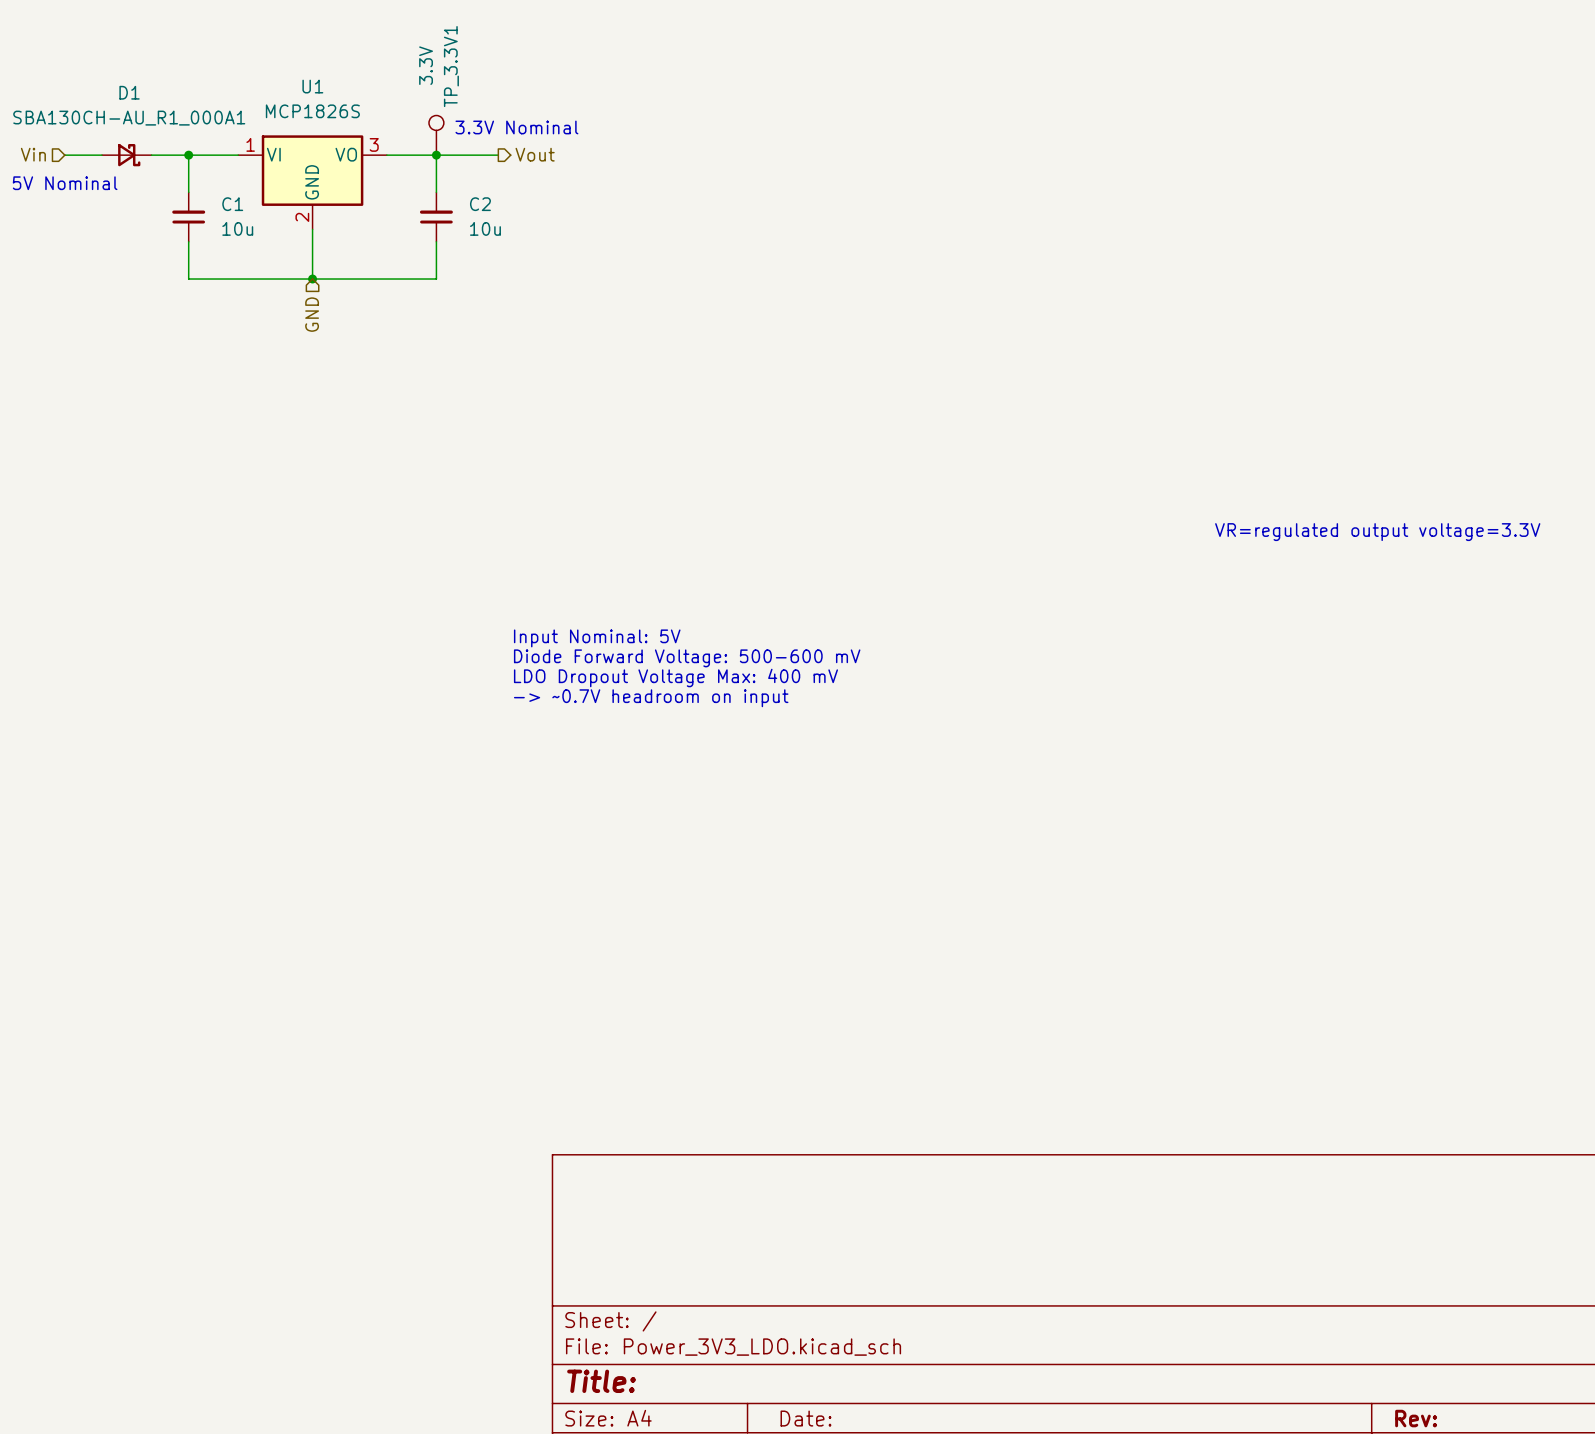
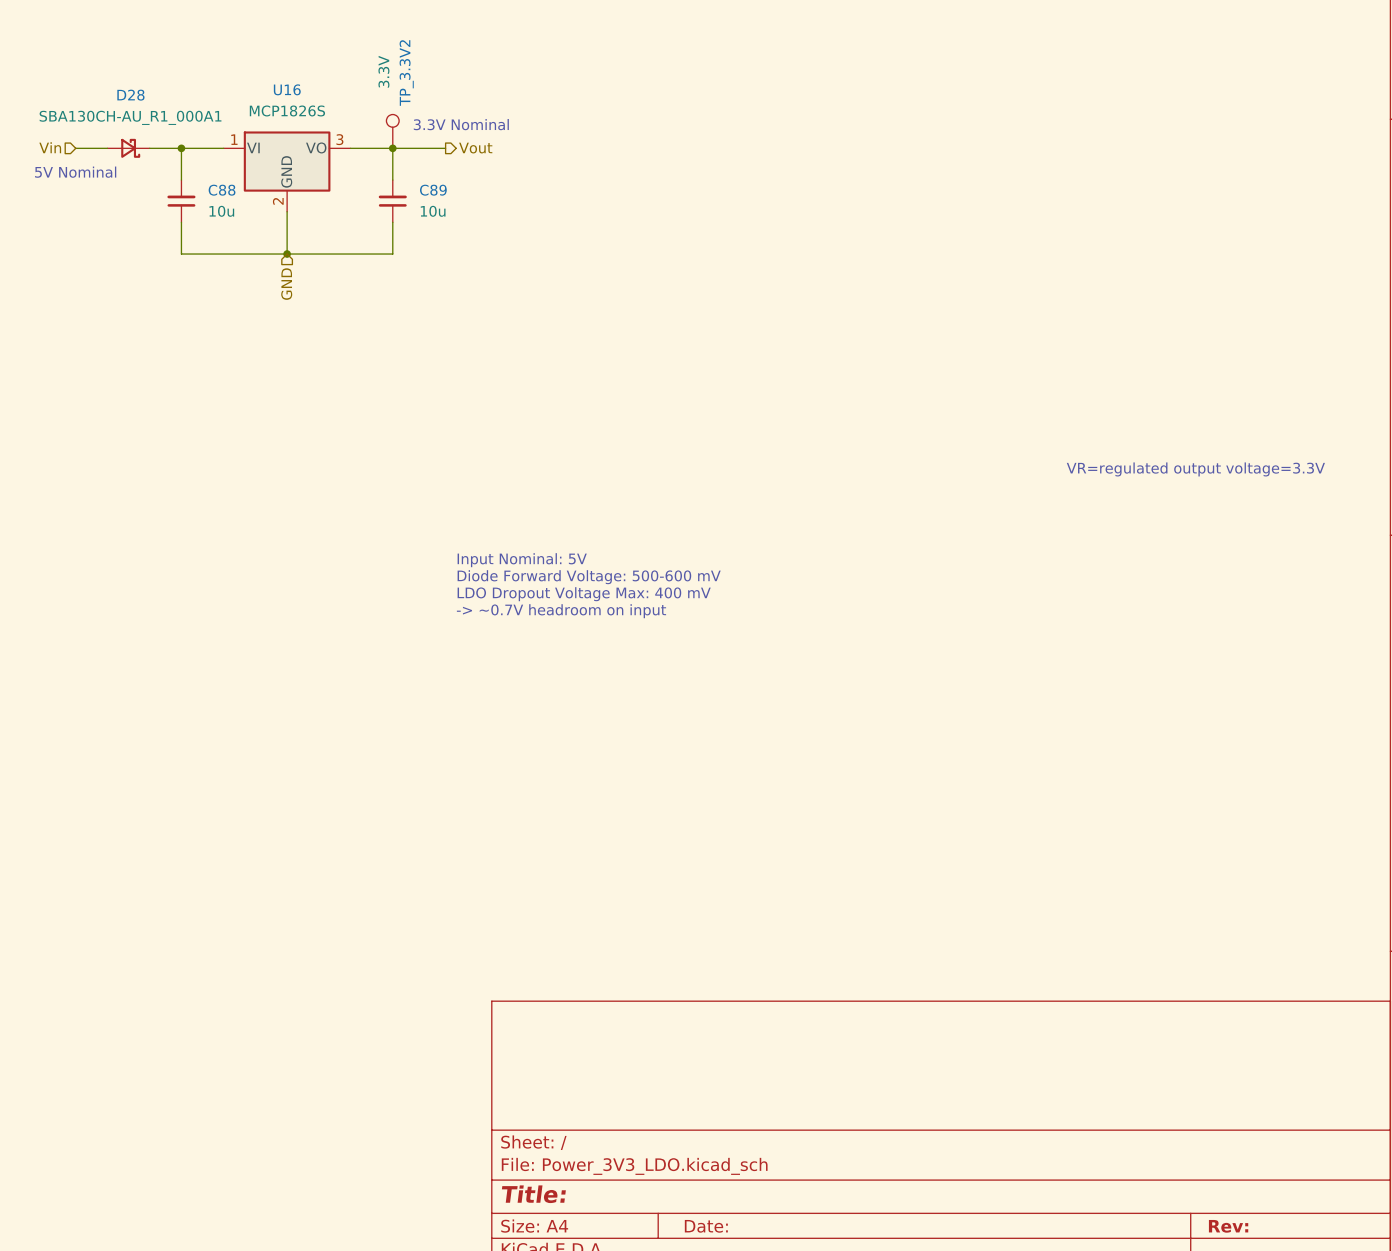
TP_3.3V1 name: TP_3.3V1 (451, 66) -> TP_3.3V2 (406, 73)
U1 name: U1 (312, 86) -> U16 (287, 89)
D1 name: D1 (129, 92) -> D28 (130, 95)
C1 name: C1 (232, 204) -> C88 (222, 190)
C2 name: C2 (480, 204) -> C89 (433, 190)

